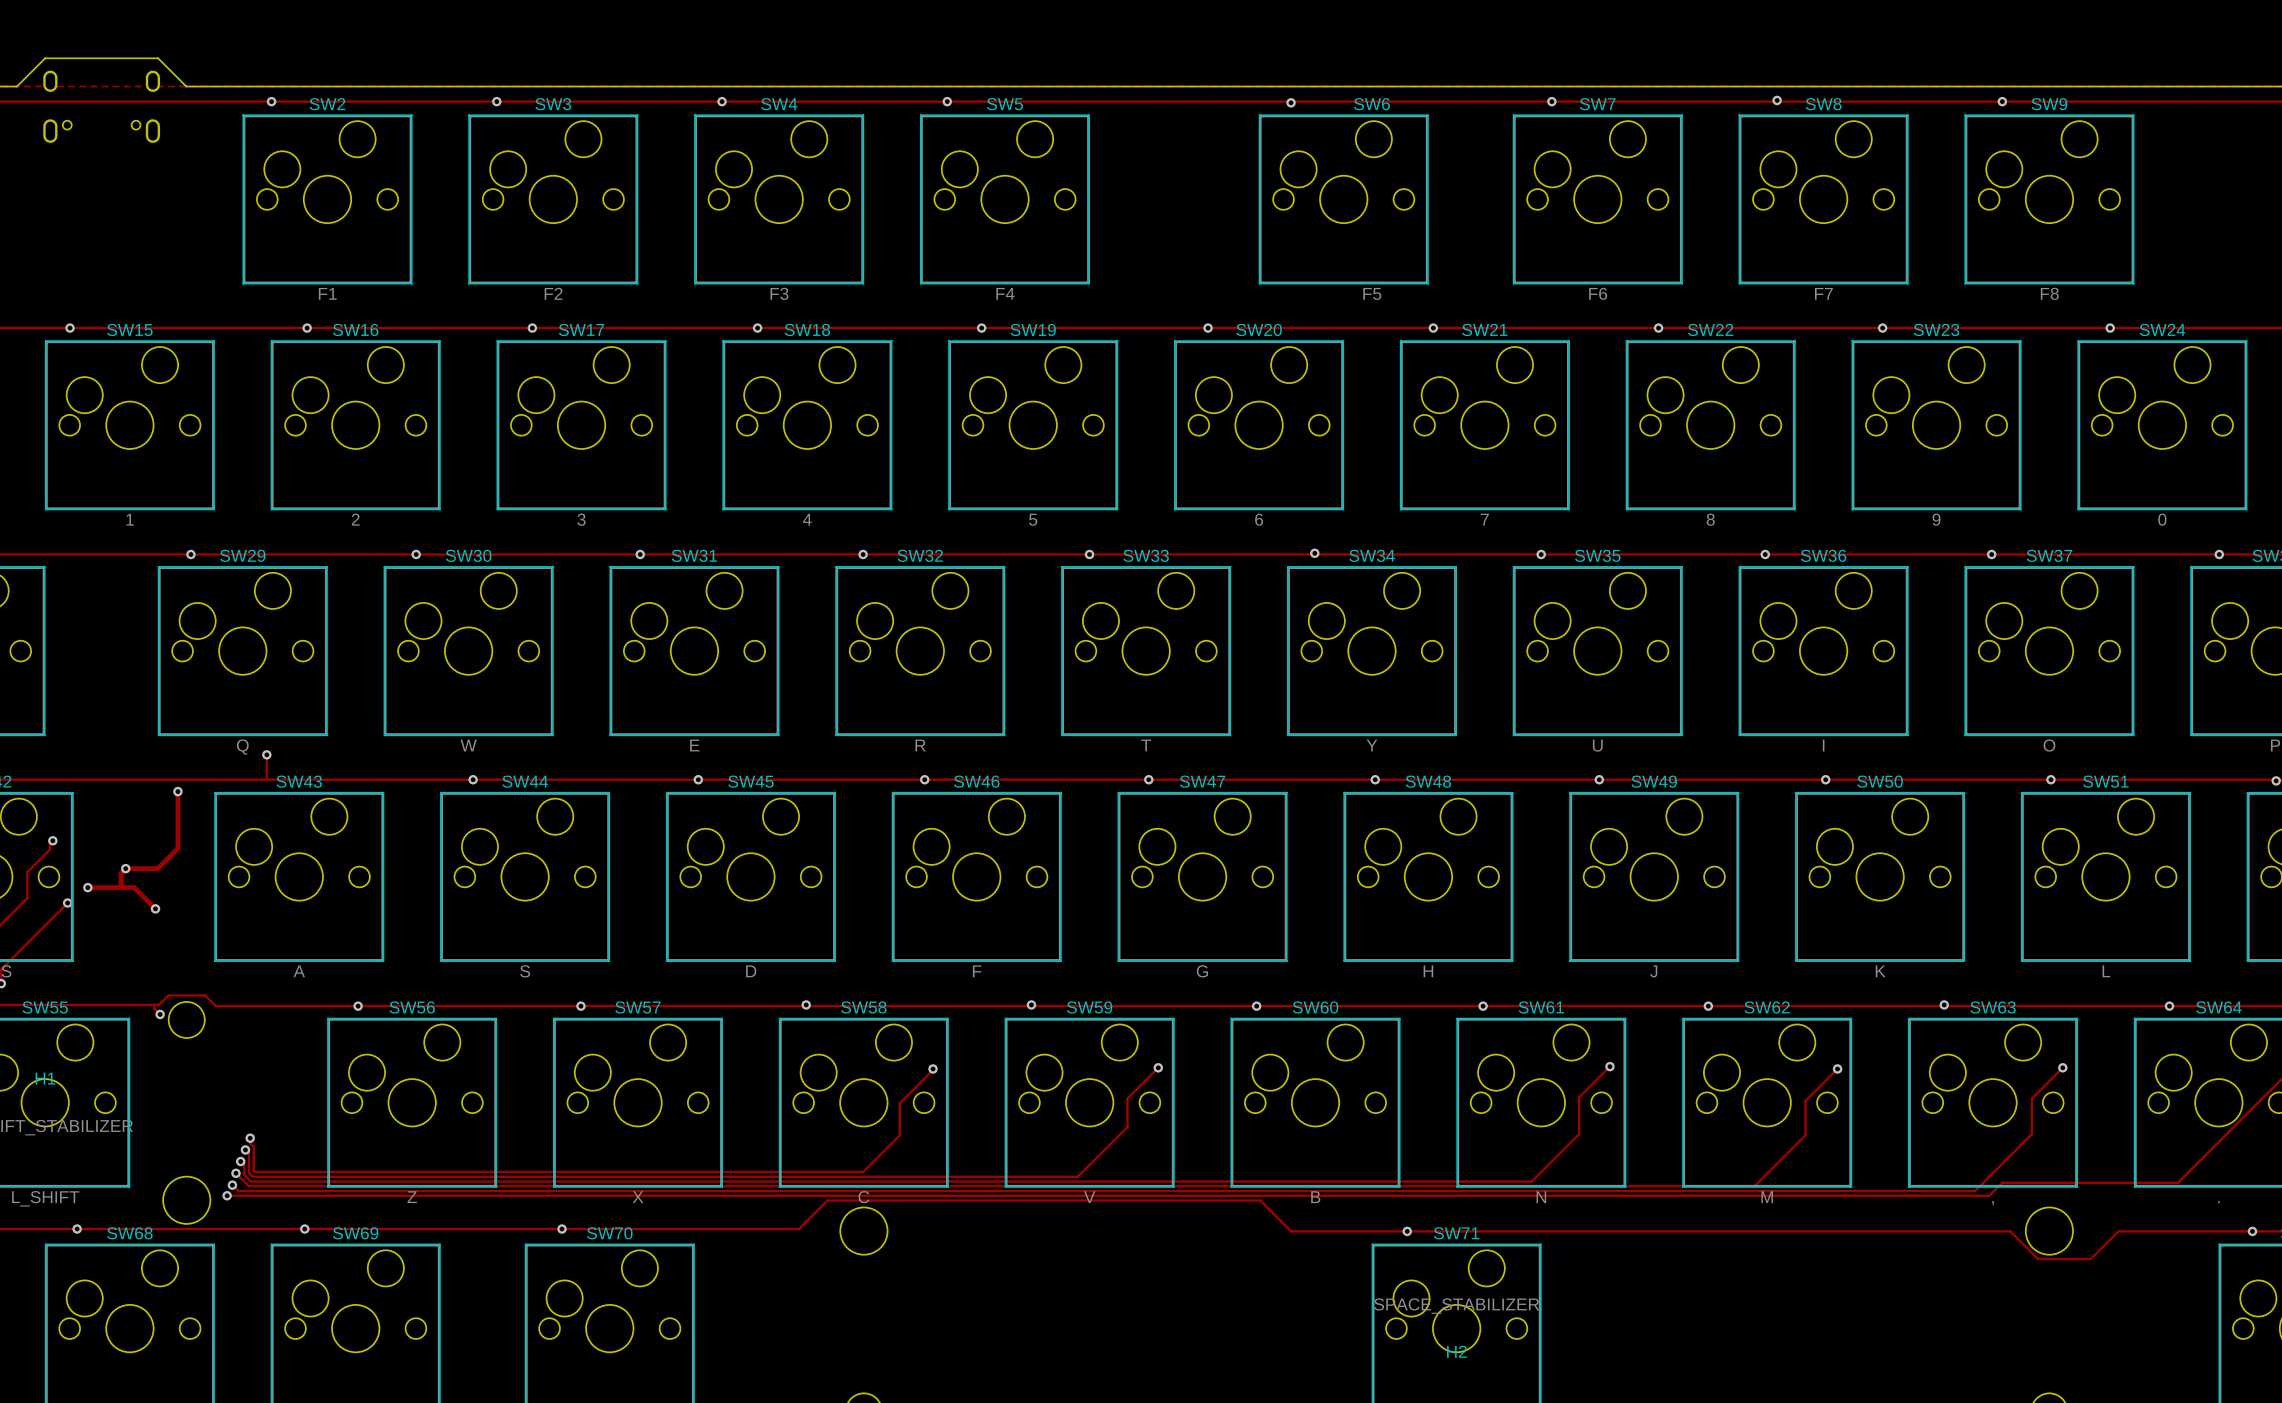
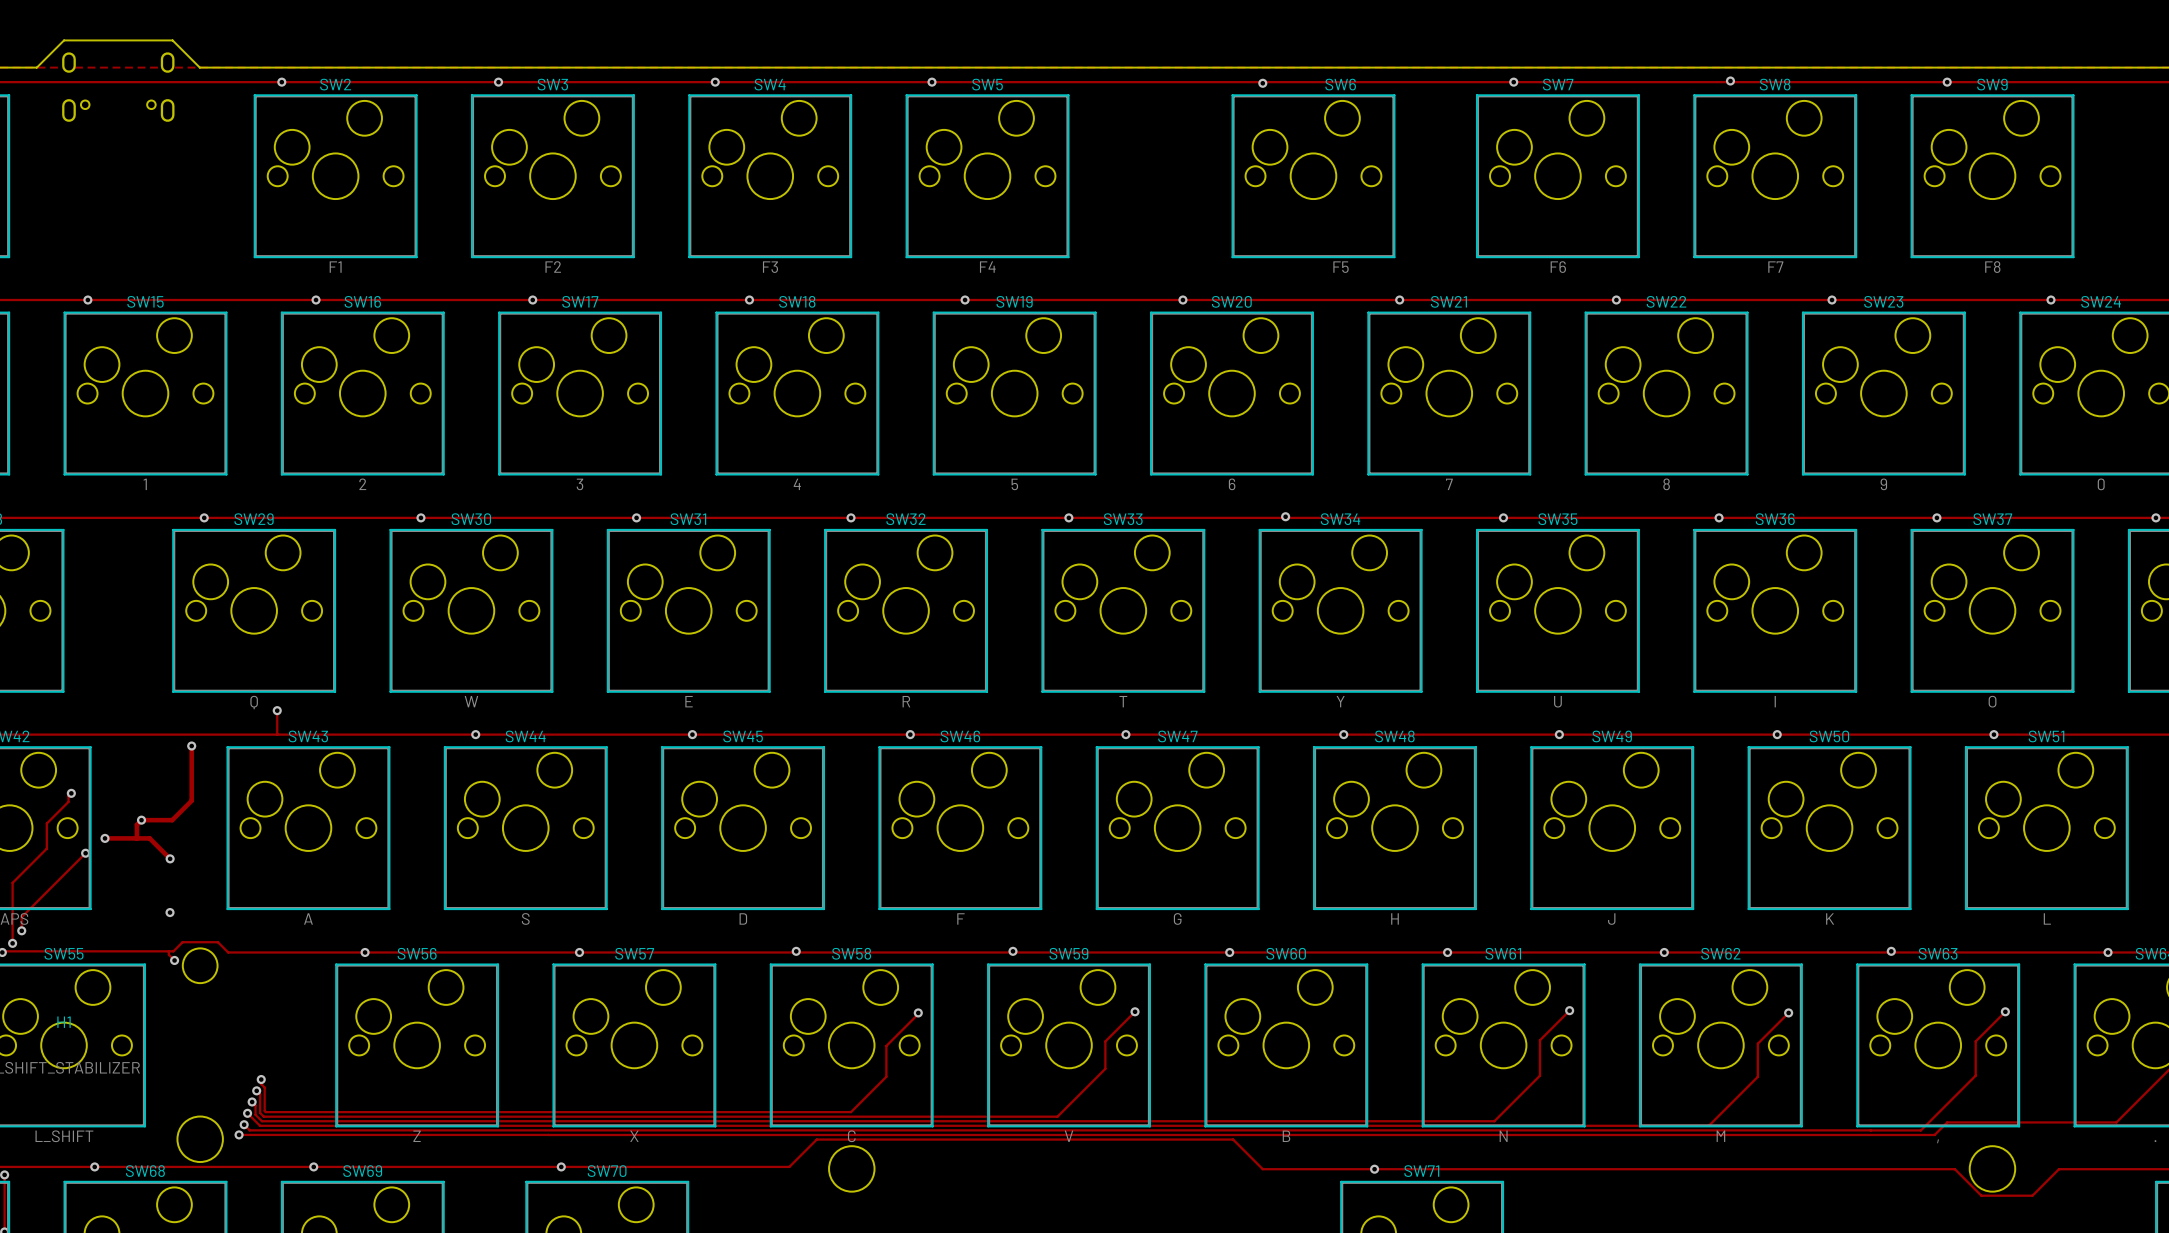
via: none -> (170, 912)

